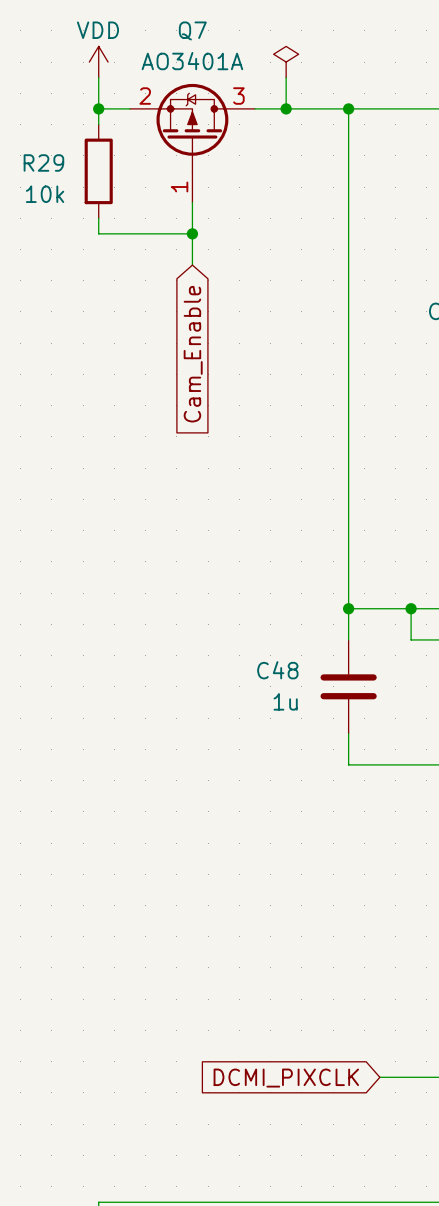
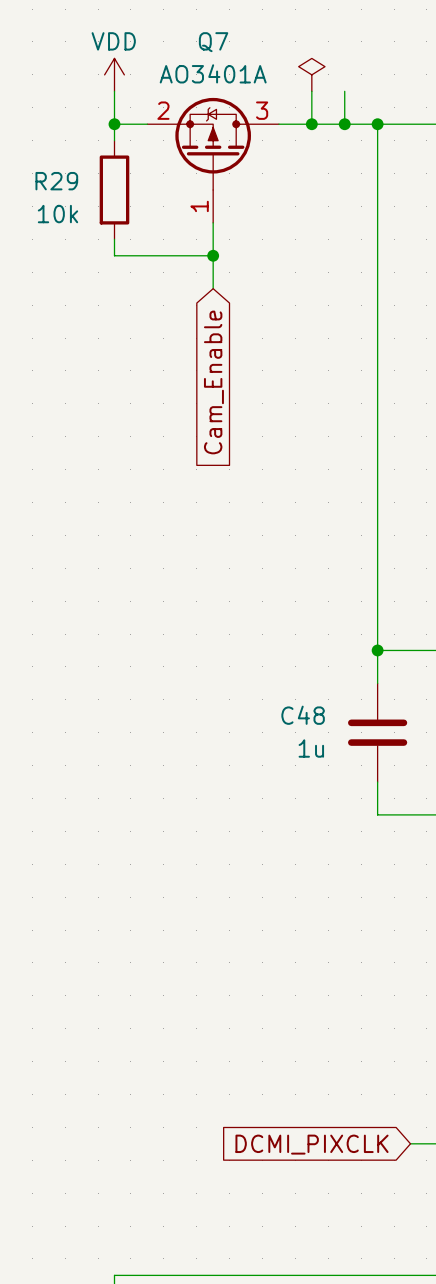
wire: none -> (344, 91) (344, 124)
junction: none -> (344, 124)

